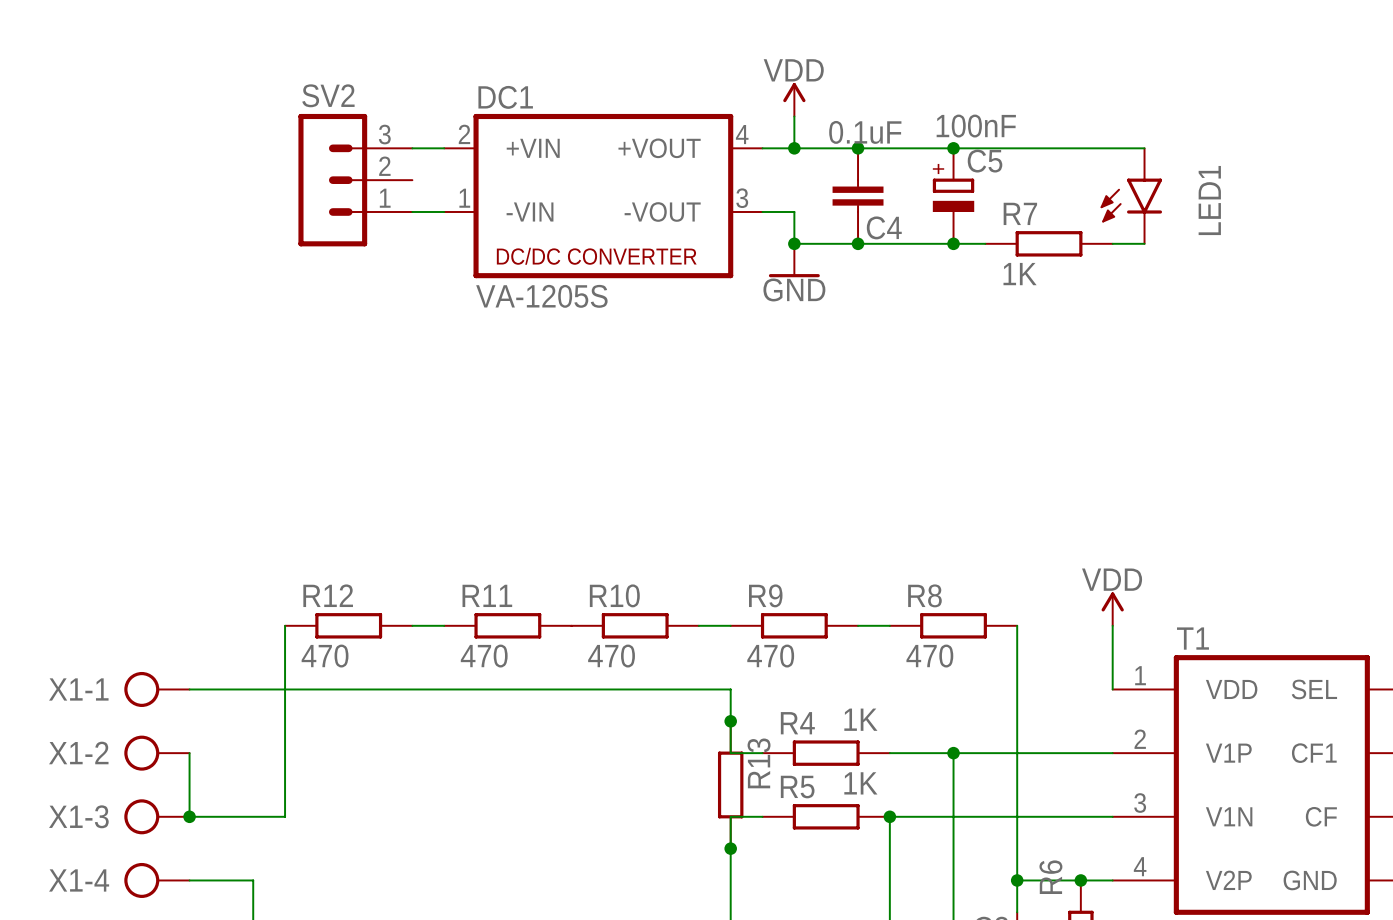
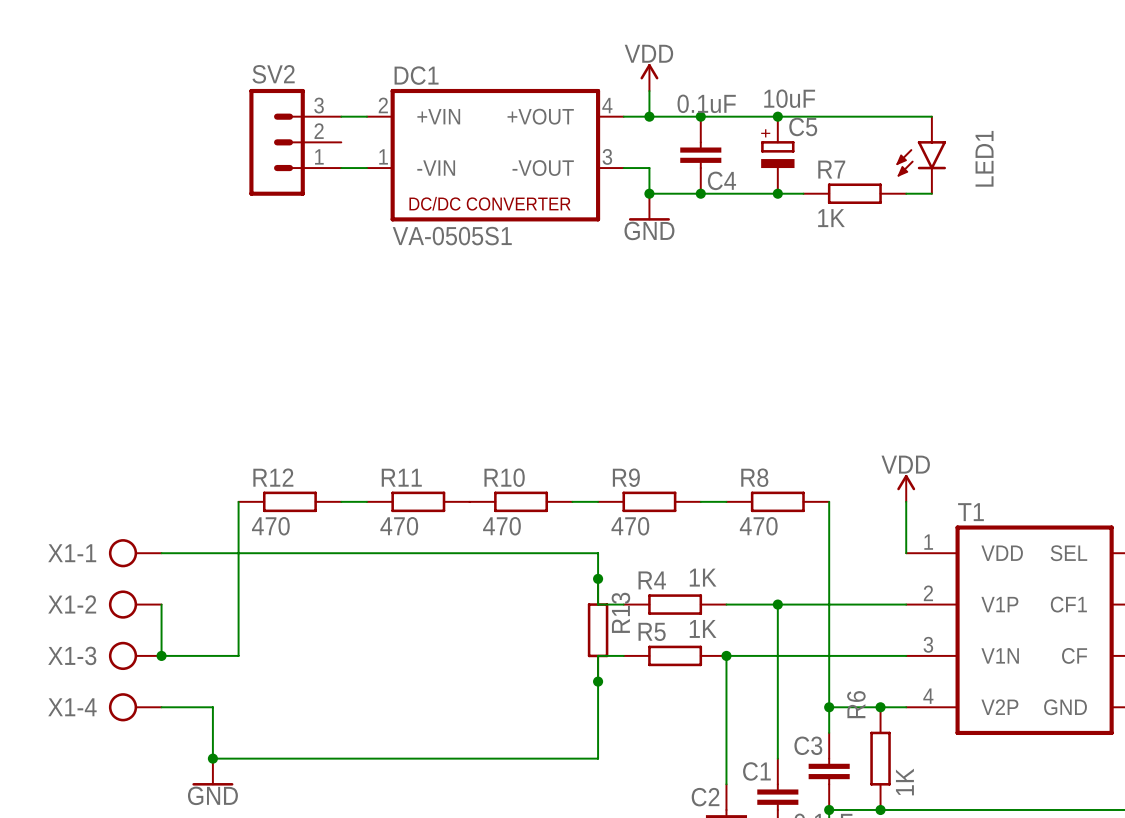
C5 value: 100nF (976, 126) -> 10uF (789, 98)
DC1 value: VA-1205S (541, 296) -> VA-0505S1 (452, 236)

